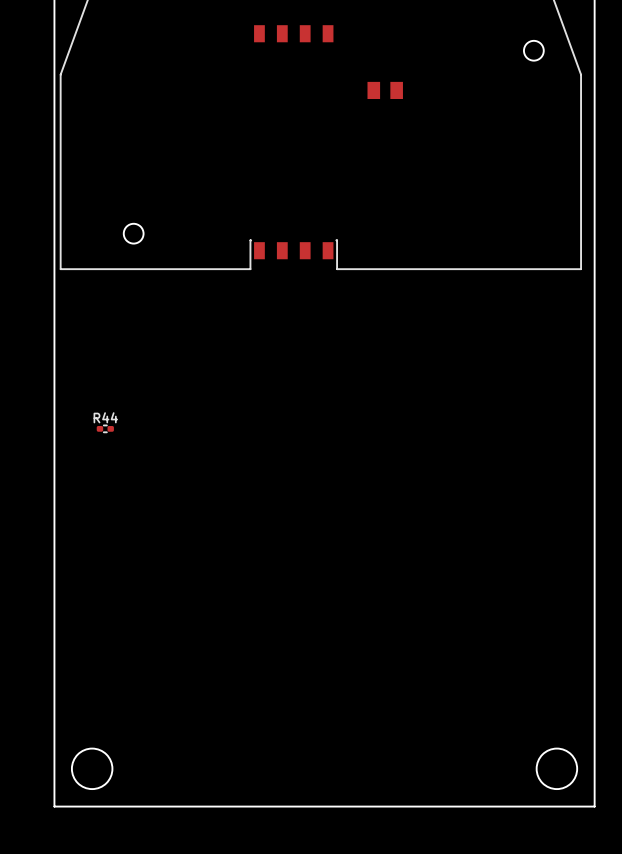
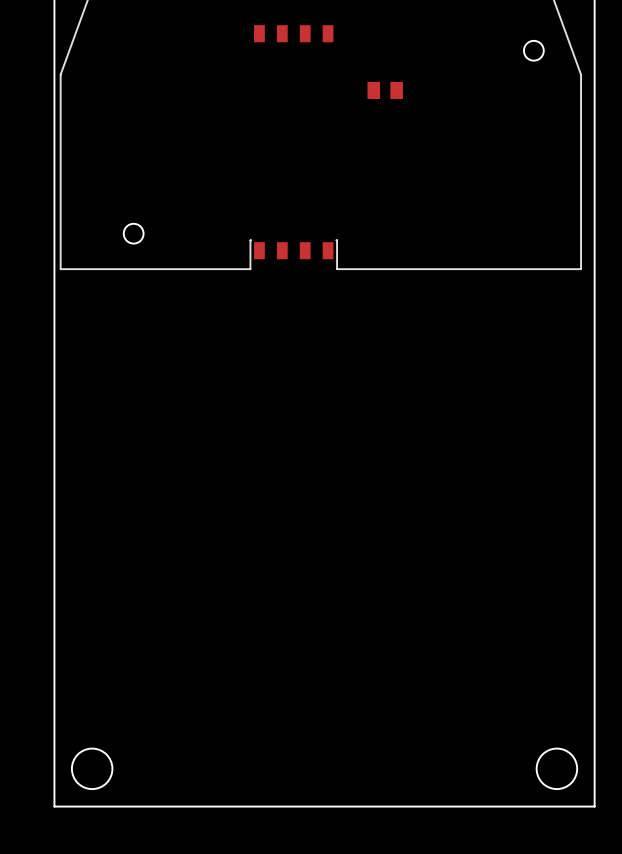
R44: (105, 428) -> none

